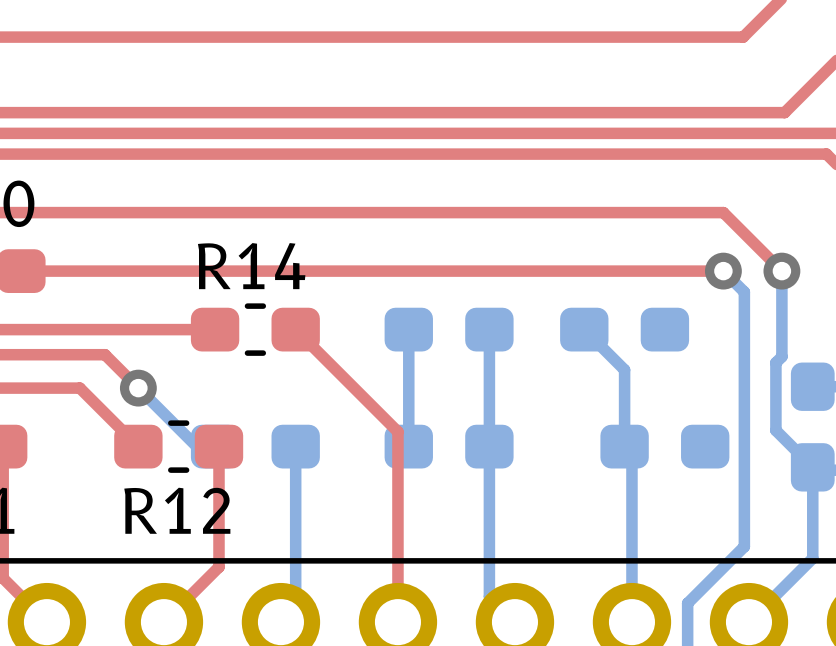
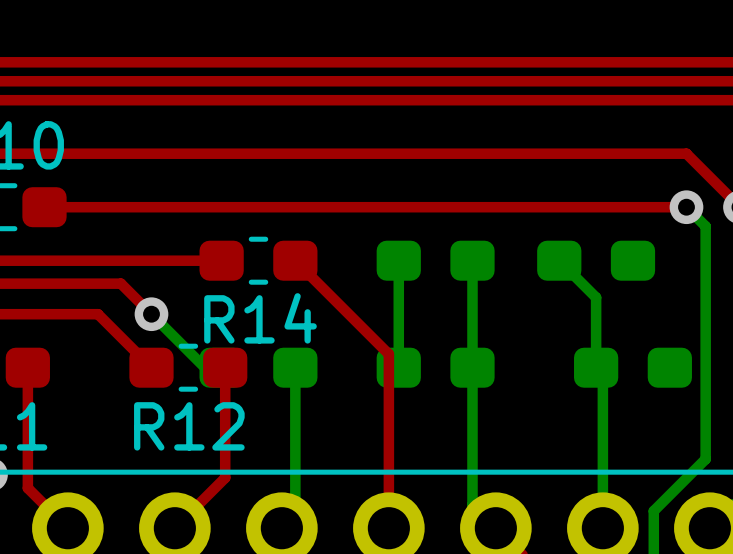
R14 name position: R14 (251, 266) -> R14 (260, 318)

